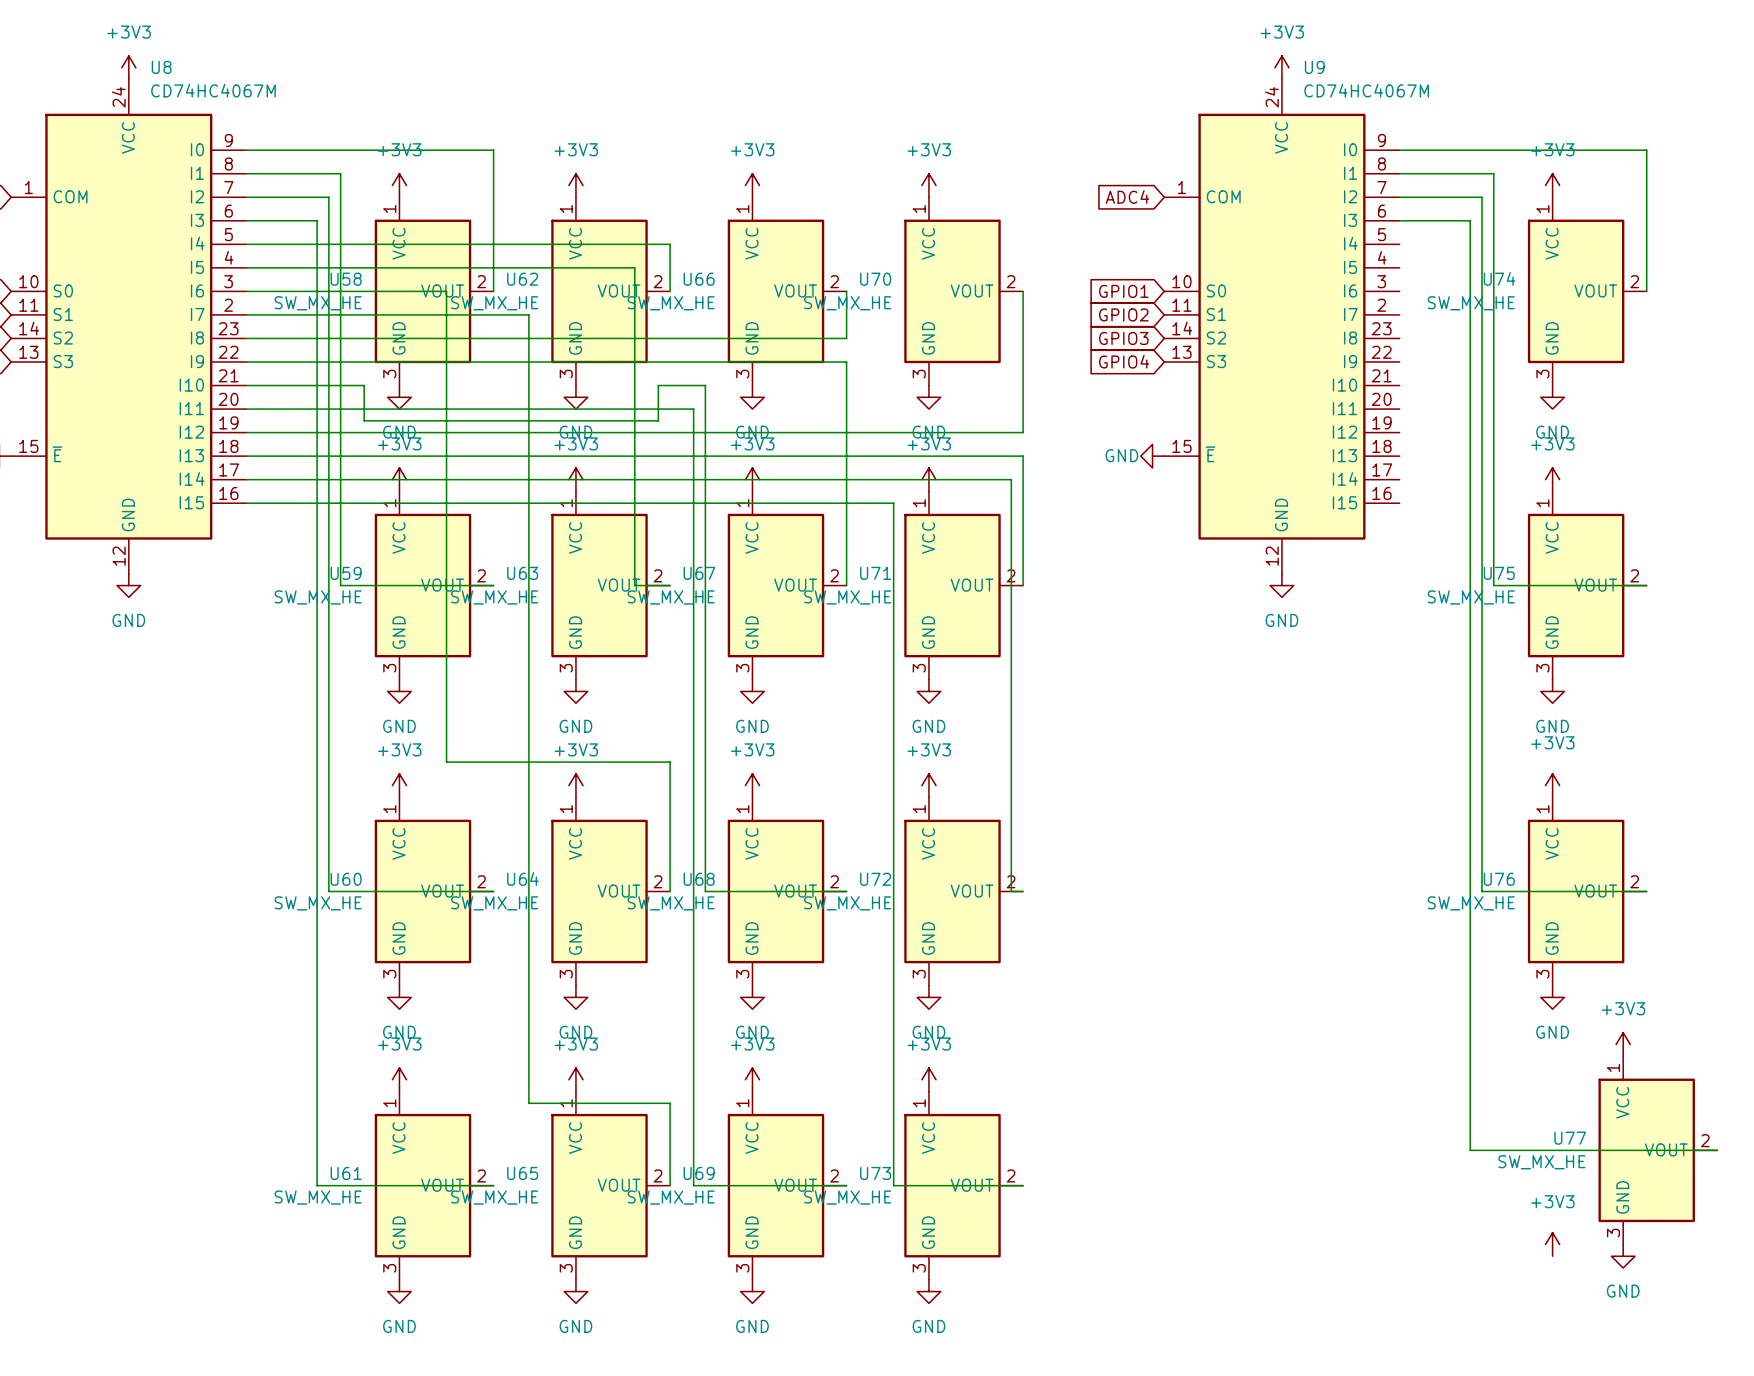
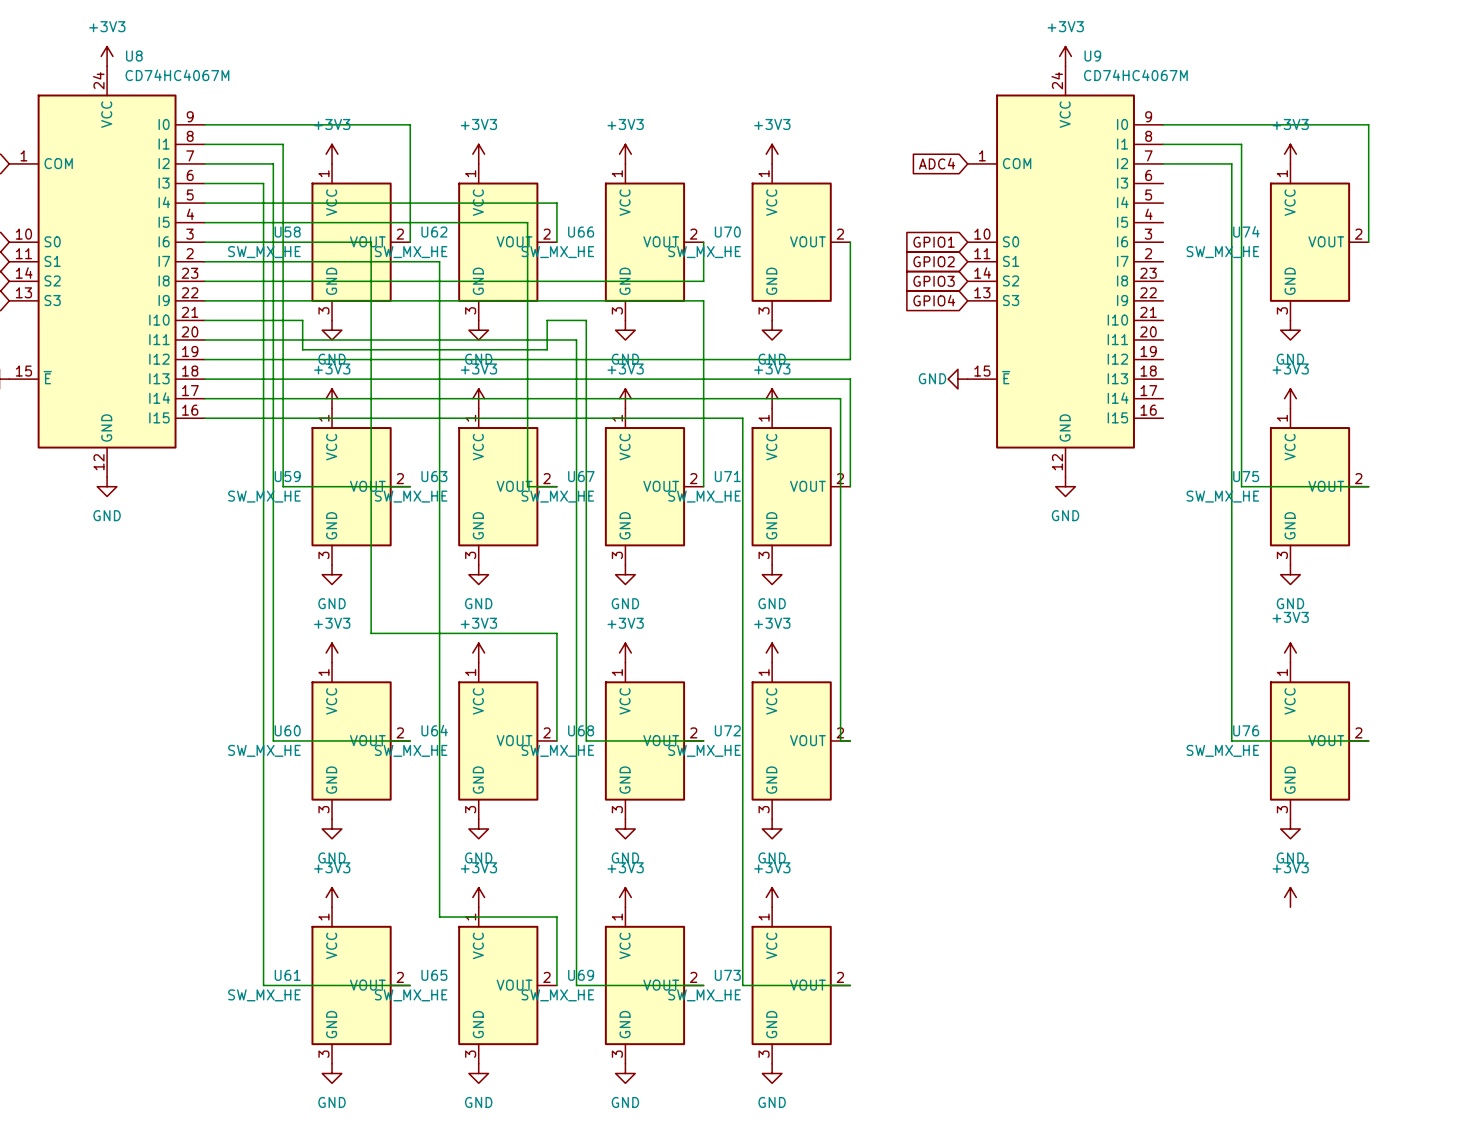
wire: (1399, 220) (1470, 220) (1470, 1150) (1717, 1150) -> none
power symbol position: +3V3 (1623, 1044) -> +3V3 (1290, 897)
U77: SW_MX_HE (1657, 1150) -> none
power symbol: +3V3 (1552, 1244) -> none
power symbol: GND (1623, 1256) -> none

